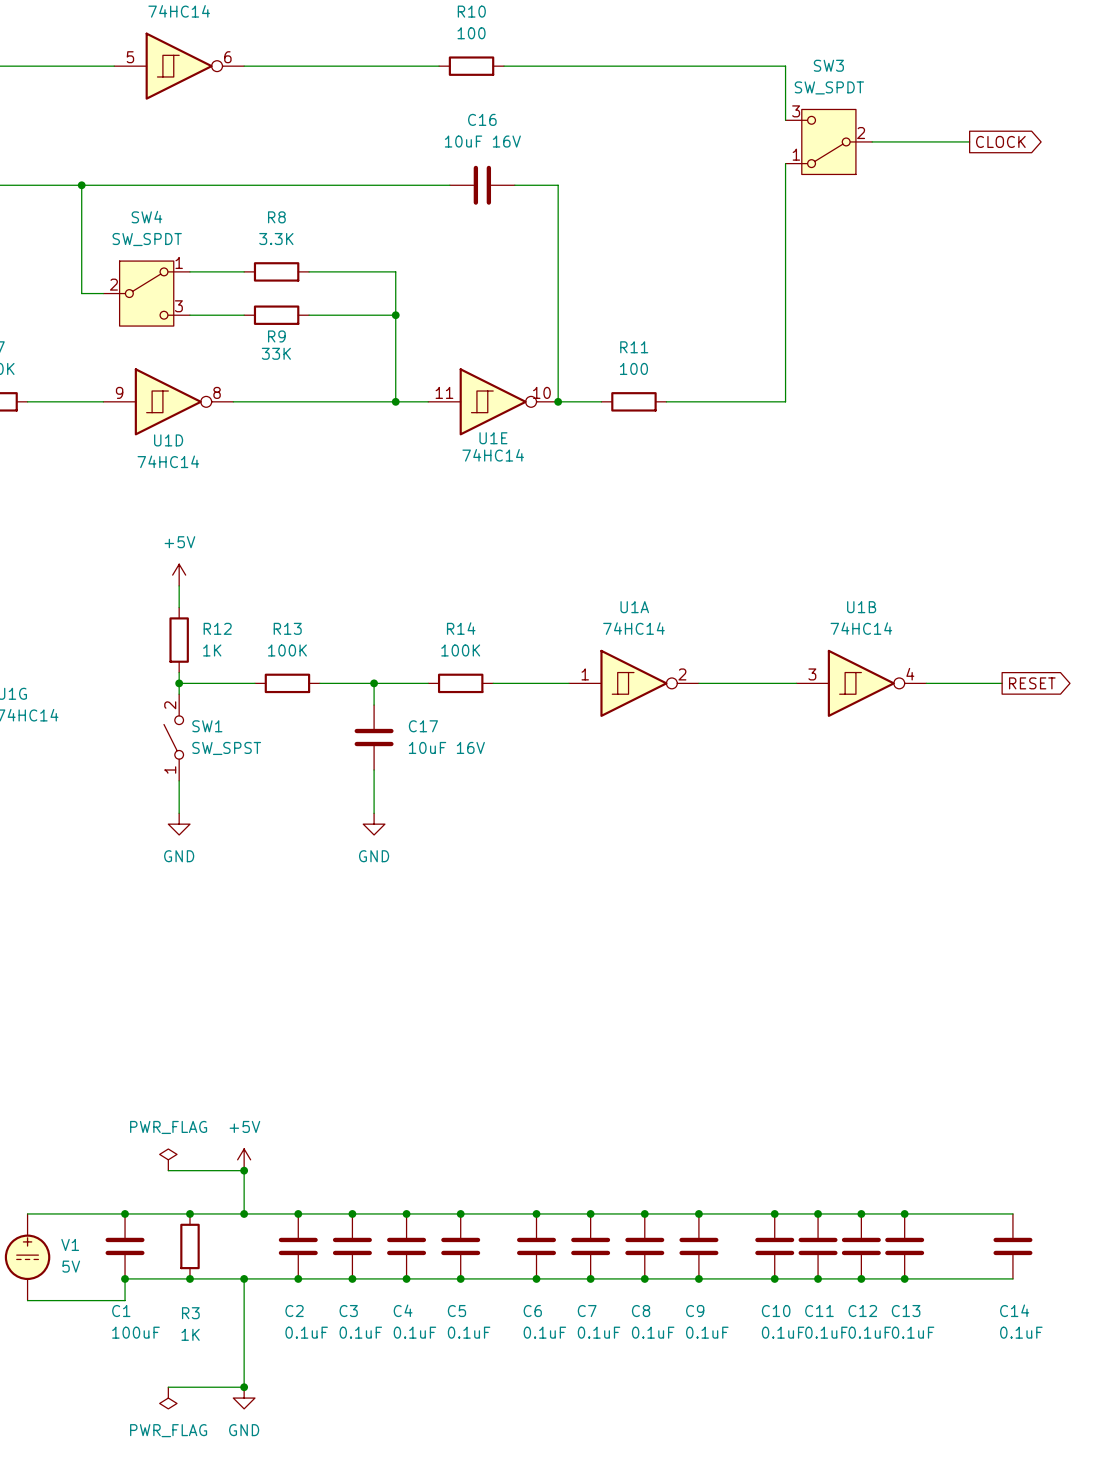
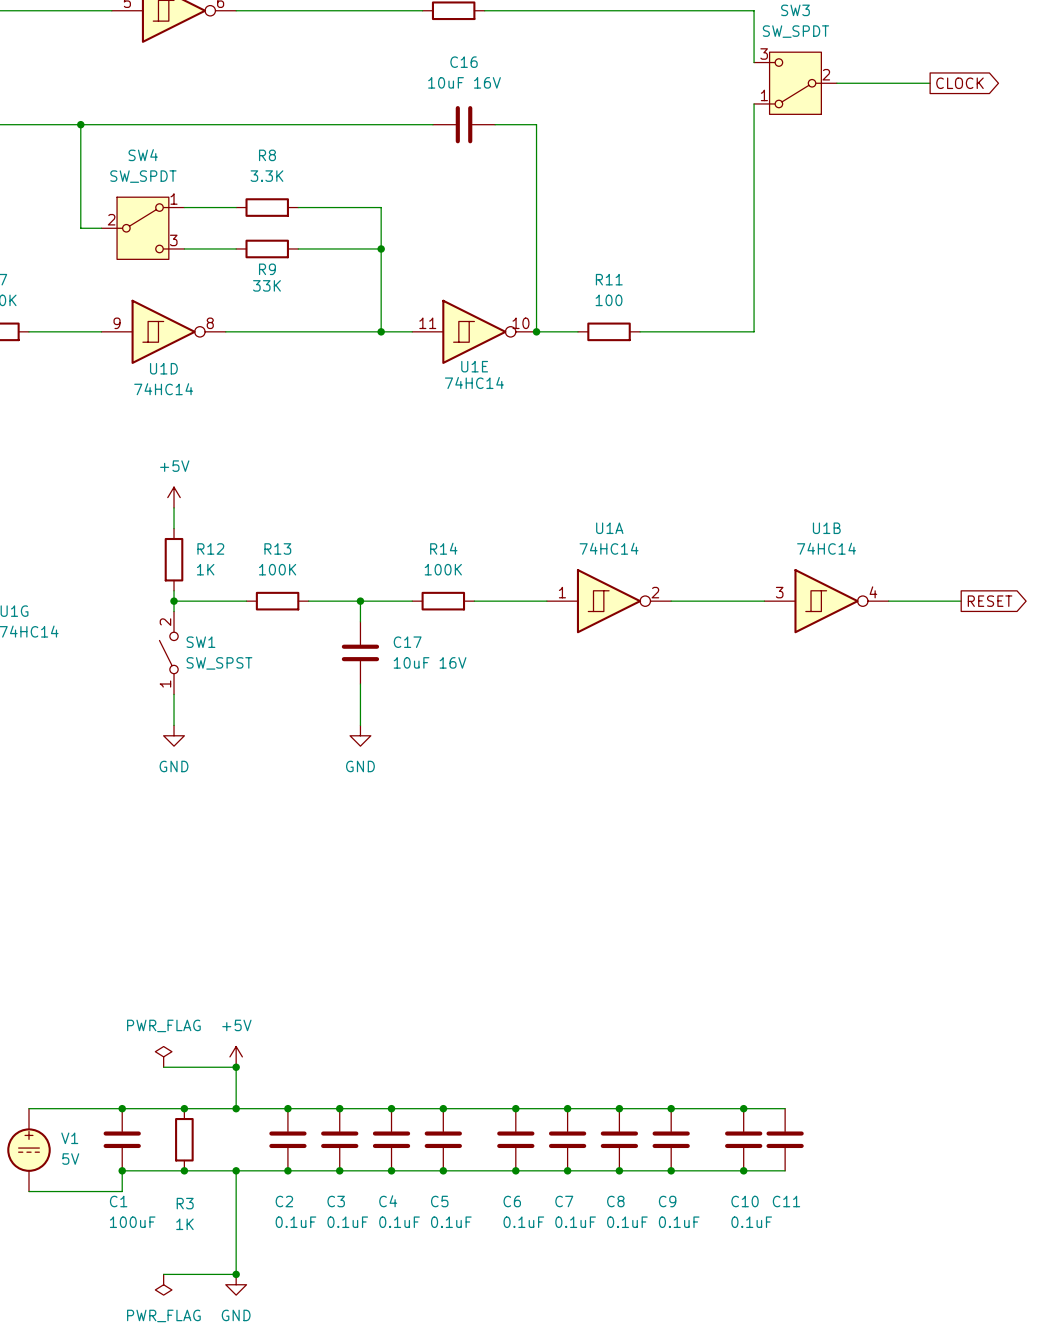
wire: (818, 1213) (1012, 1213) -> none
junction: (818, 1213) -> none
junction: (861, 1213) -> none
junction: (904, 1213) -> none
C12: 0.1uF (861, 1246) -> none
C13: 0.1uF (904, 1246) -> none
C14: 0.1uF (1012, 1246) -> none
wire: (818, 1278) (1012, 1278) -> none
junction: (818, 1278) -> none
junction: (861, 1278) -> none
junction: (904, 1278) -> none
C11 value: 0.1uF (826, 1332) -> none

